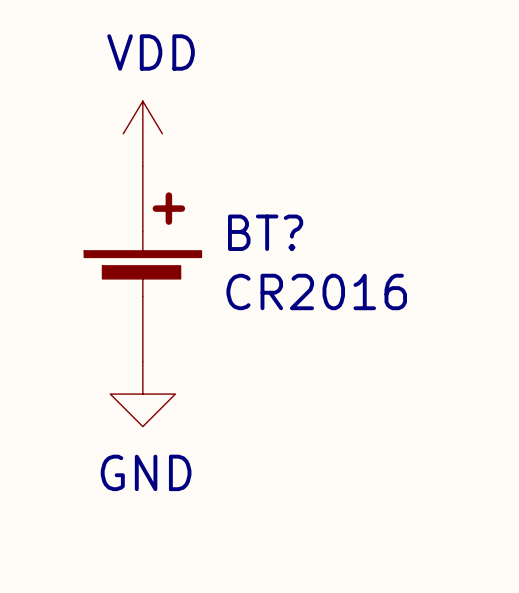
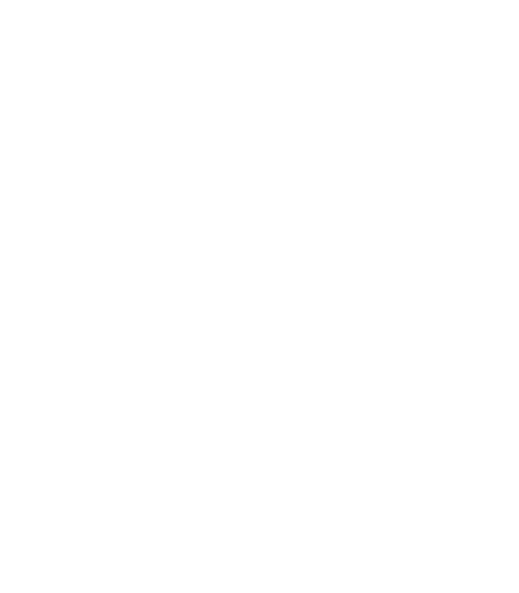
power symbol: VDD (142, 133) -> none
BT?: CR2016 (142, 263) -> none
power symbol: GND (142, 394) -> none

